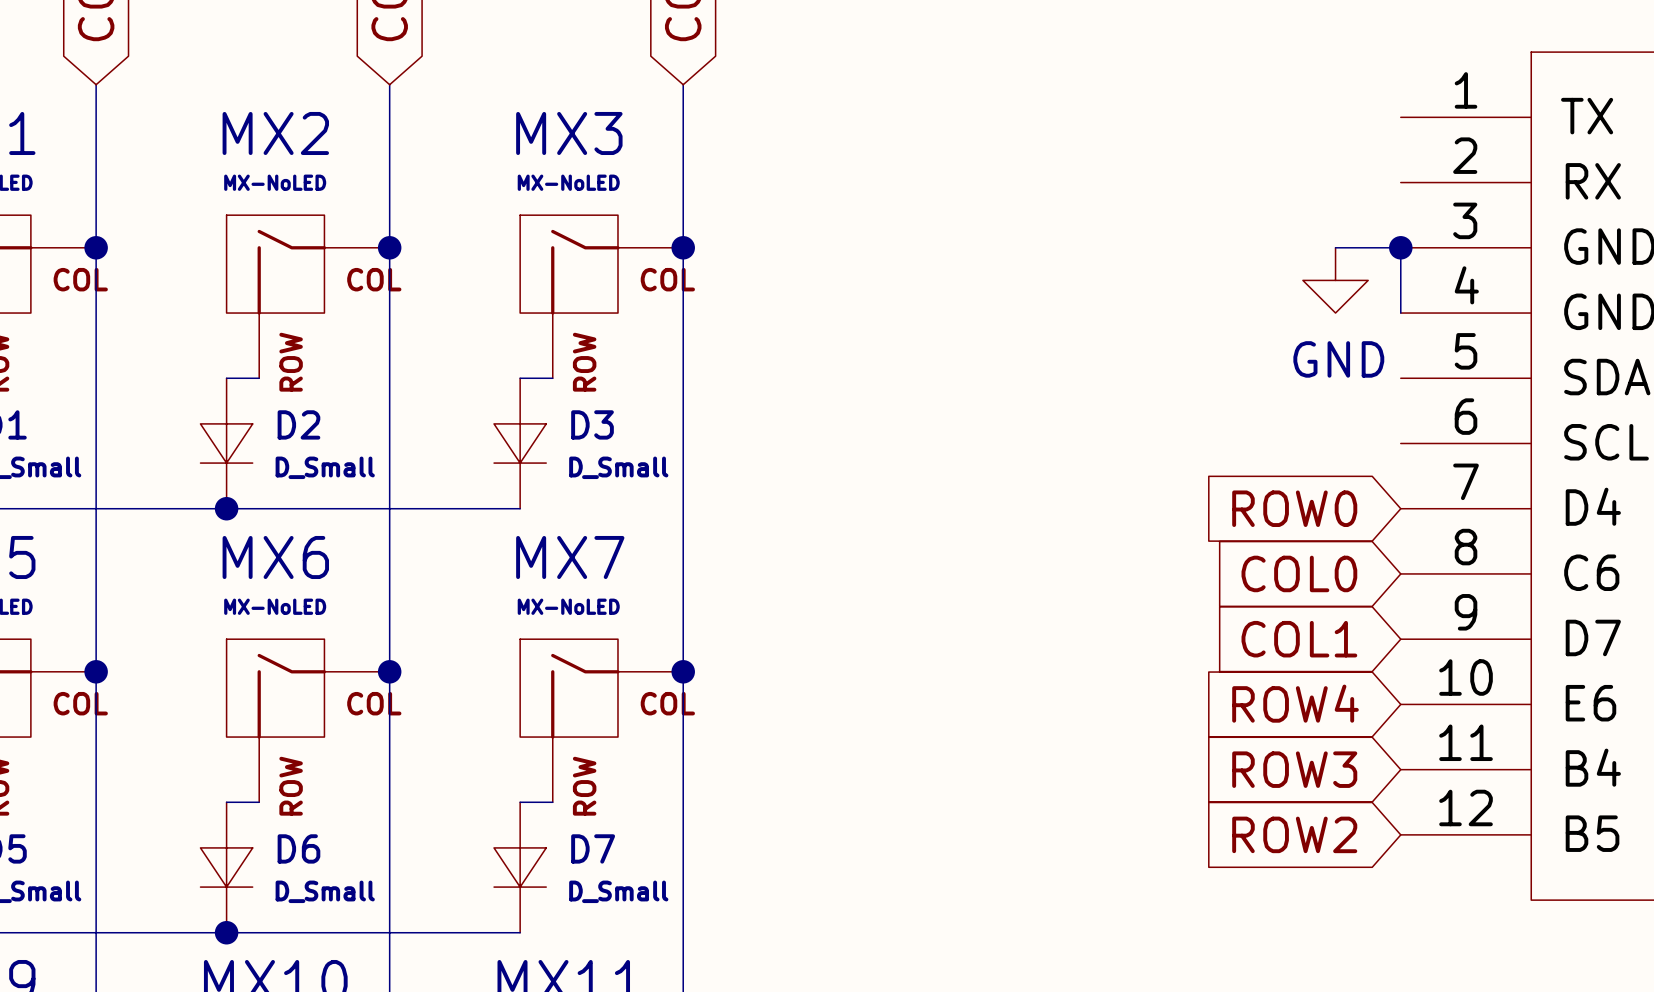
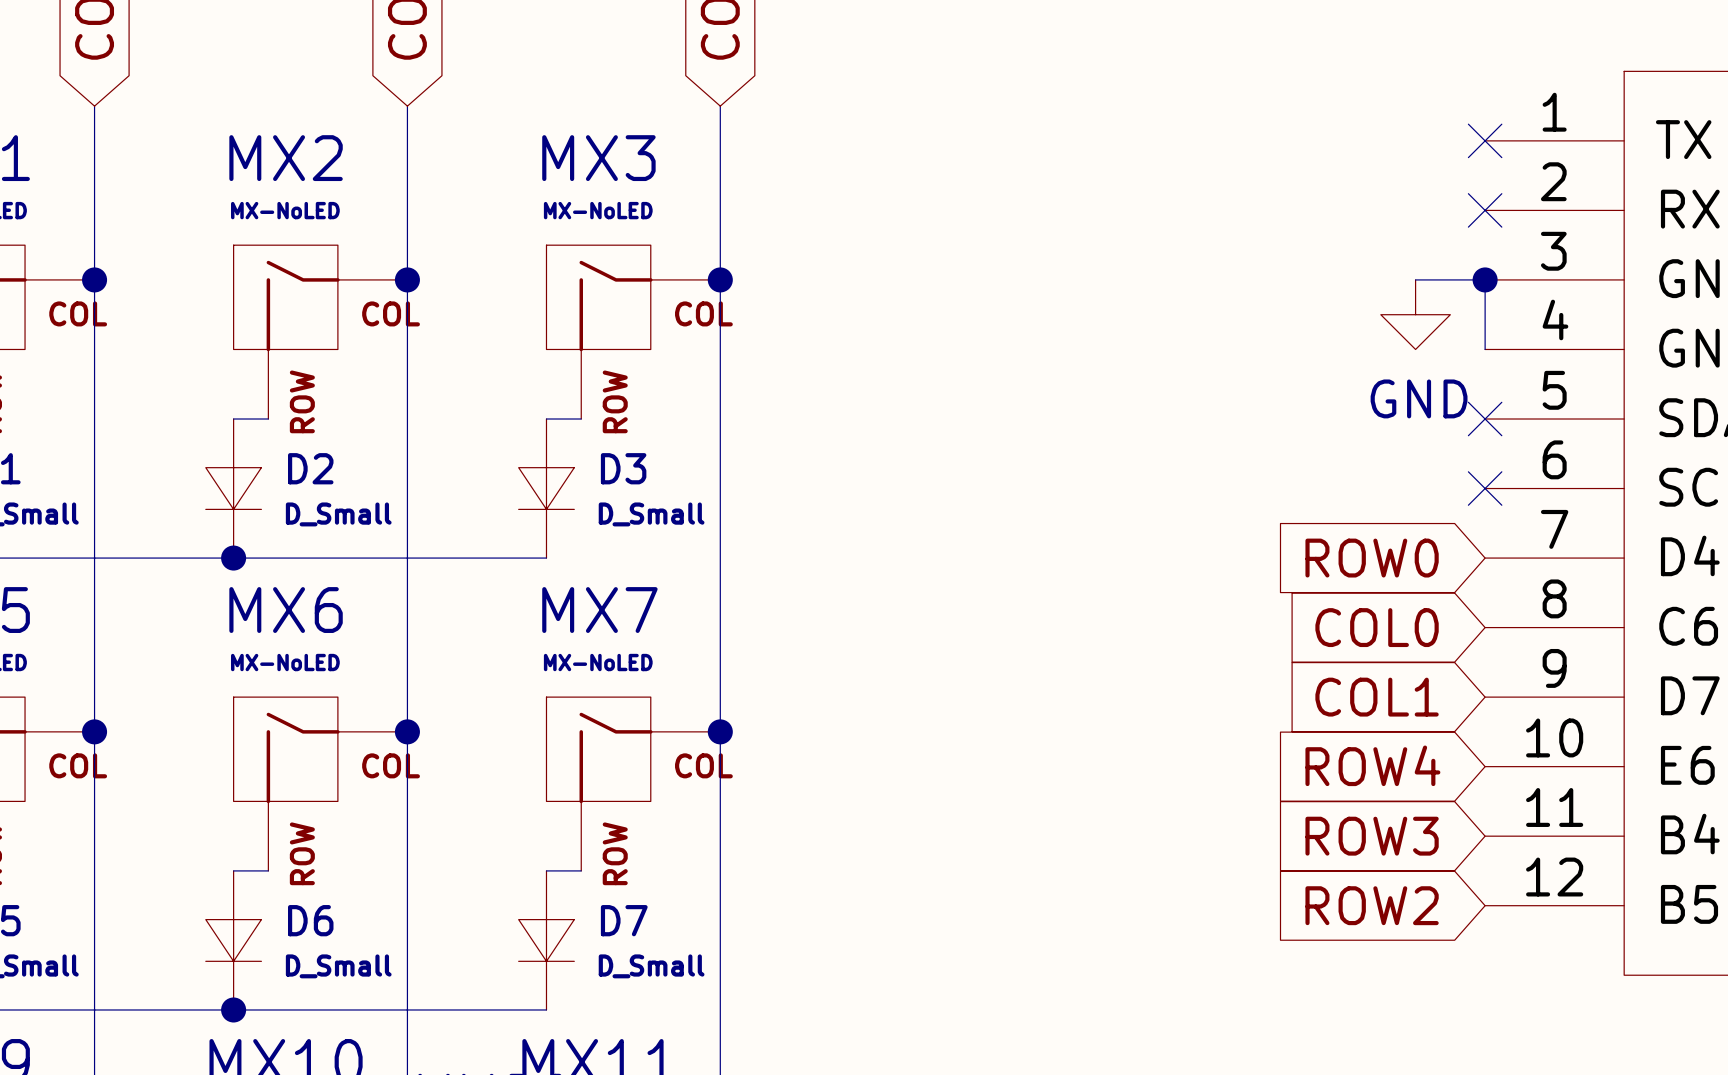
no-connect mark: none -> (1485, 140)
no-connect mark: none -> (1485, 210)
no-connect mark: none -> (1485, 419)
no-connect mark: none -> (1485, 488)

